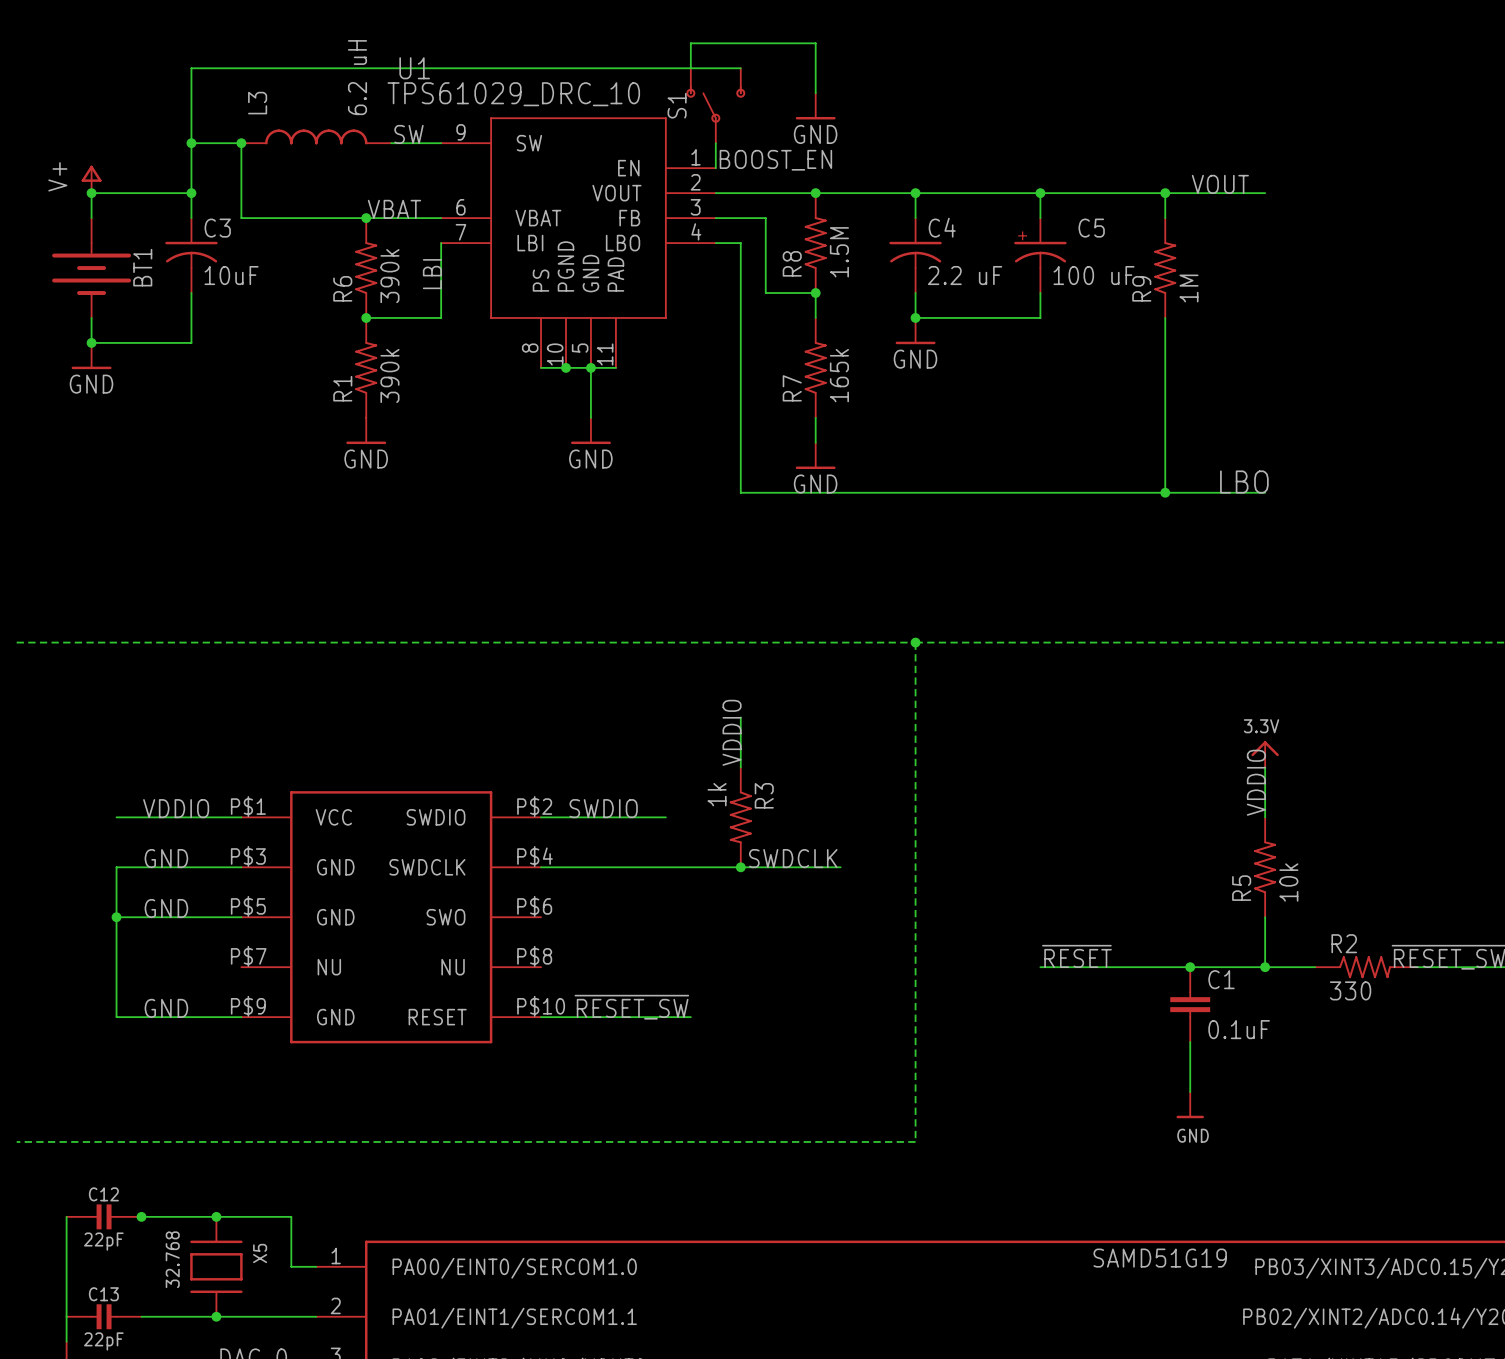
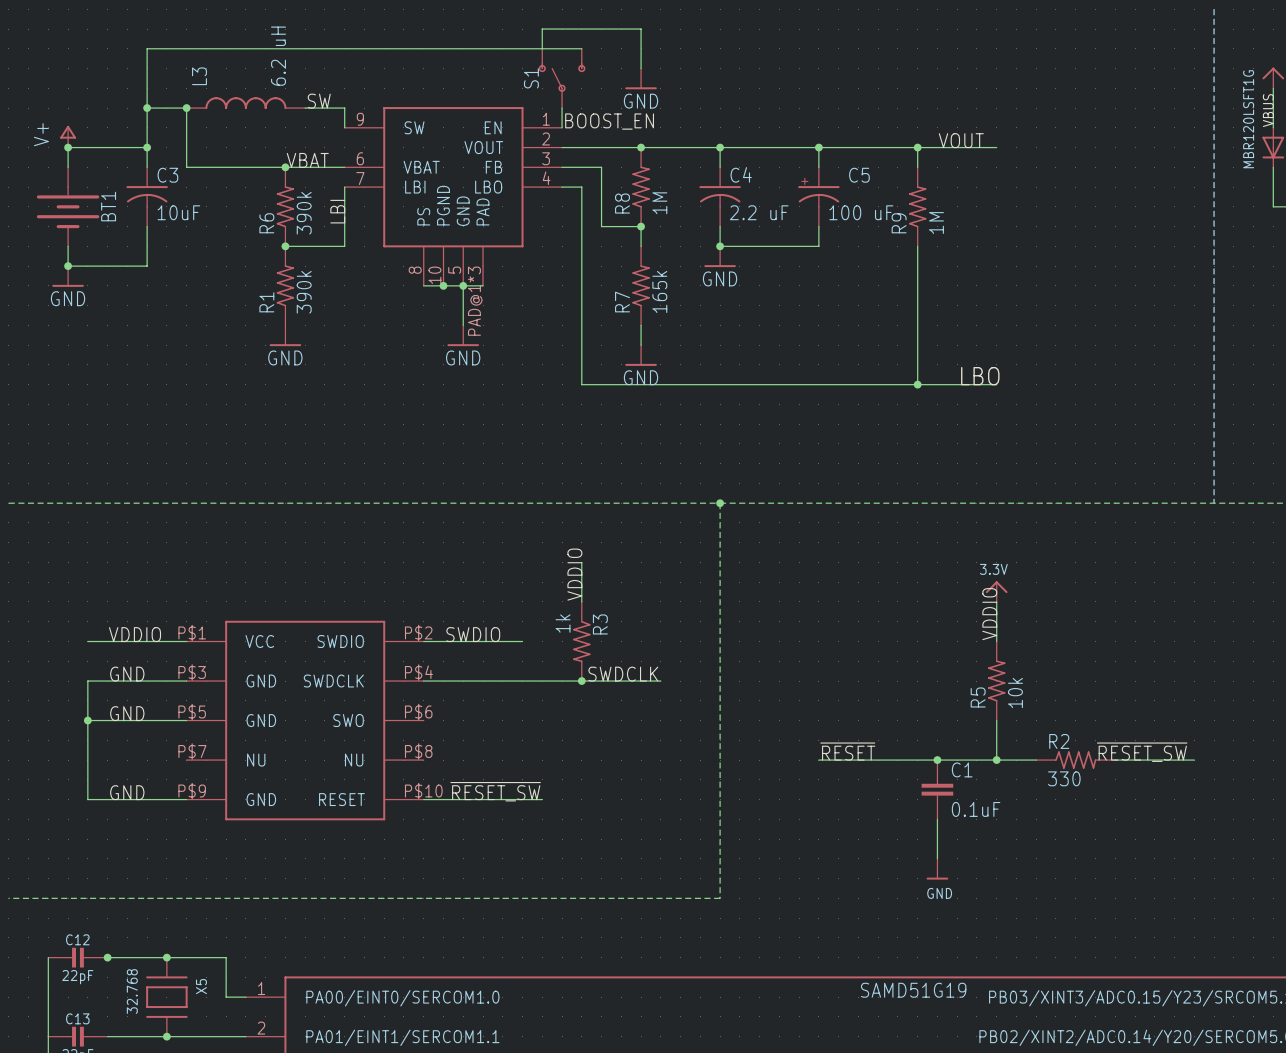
wire: none -> (344, 108) (344, 127)
U1: TPS61029_DRC_10 (578, 242) -> none
R8 value: 1.5M (839, 252) -> 1M (659, 203)
part: none -> (453, 196)

